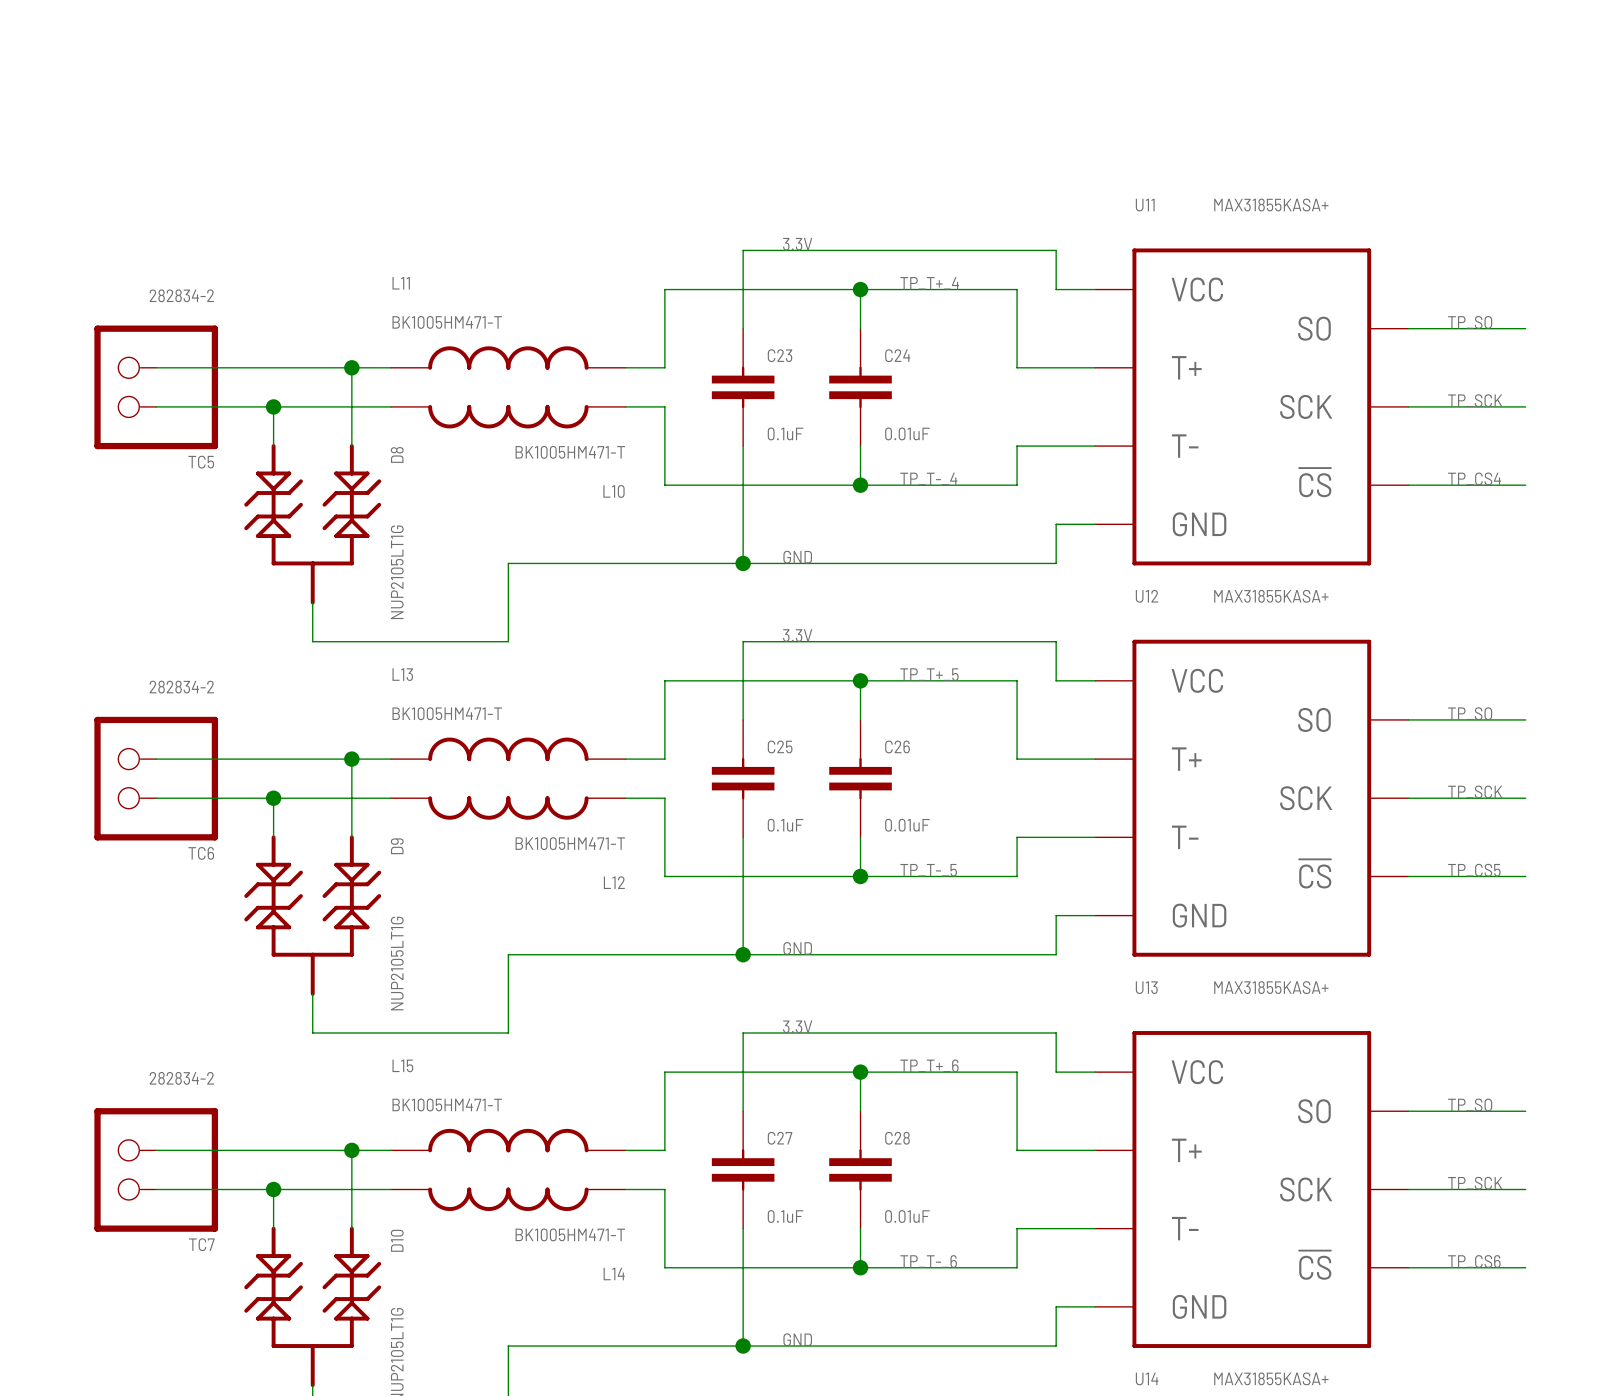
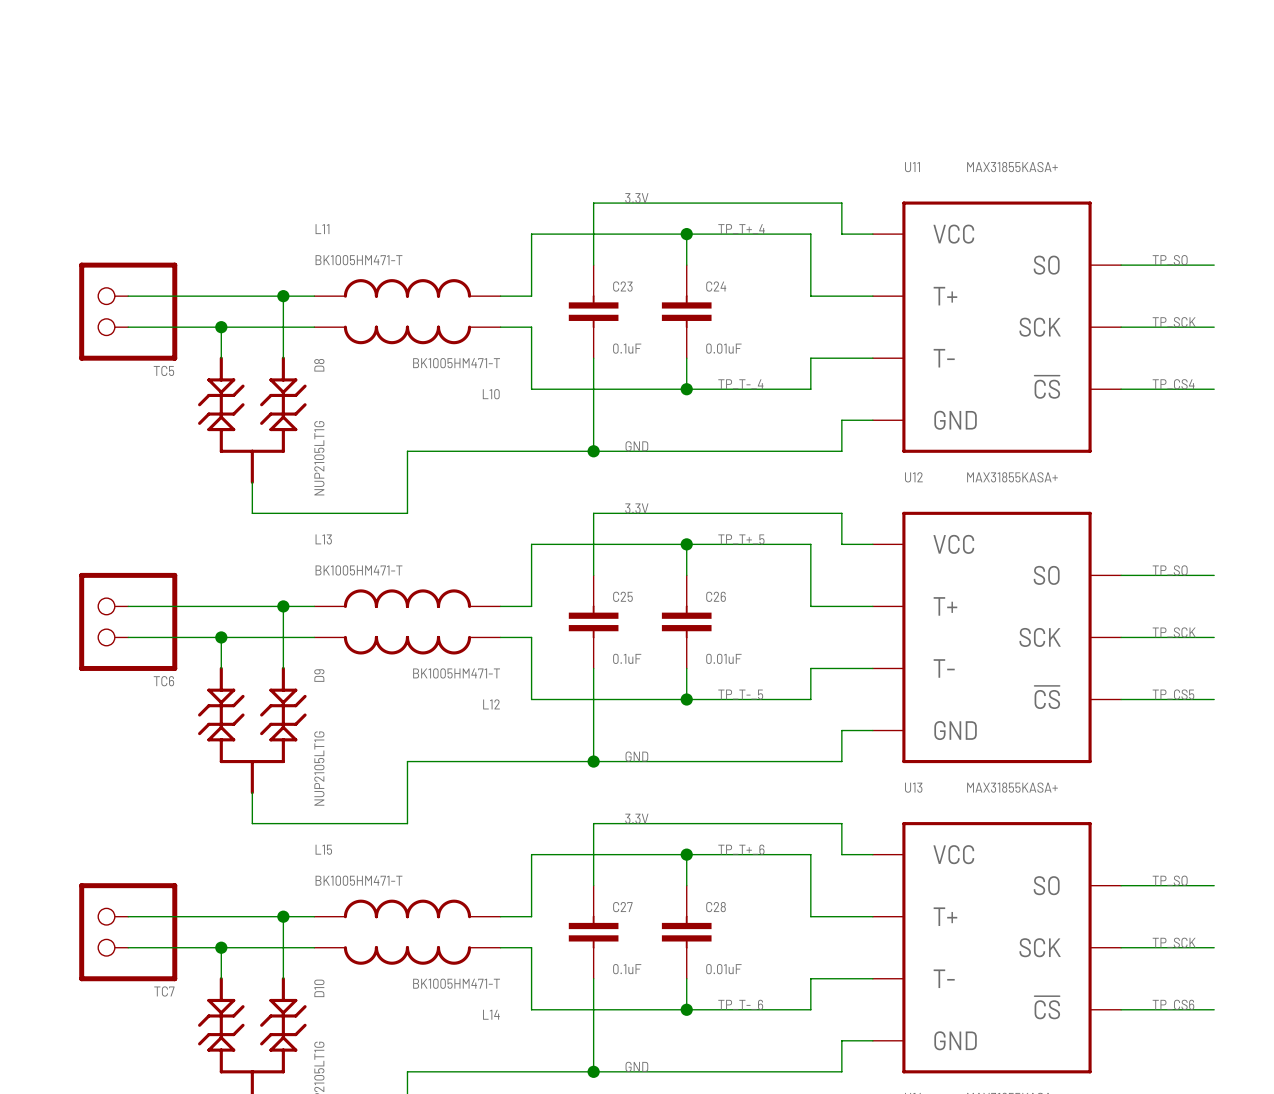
TC5 value: 282834-2 (181, 295) -> none
TC6 value: 282834-2 (181, 687) -> none
TC7 value: 282834-2 (181, 1078) -> none

